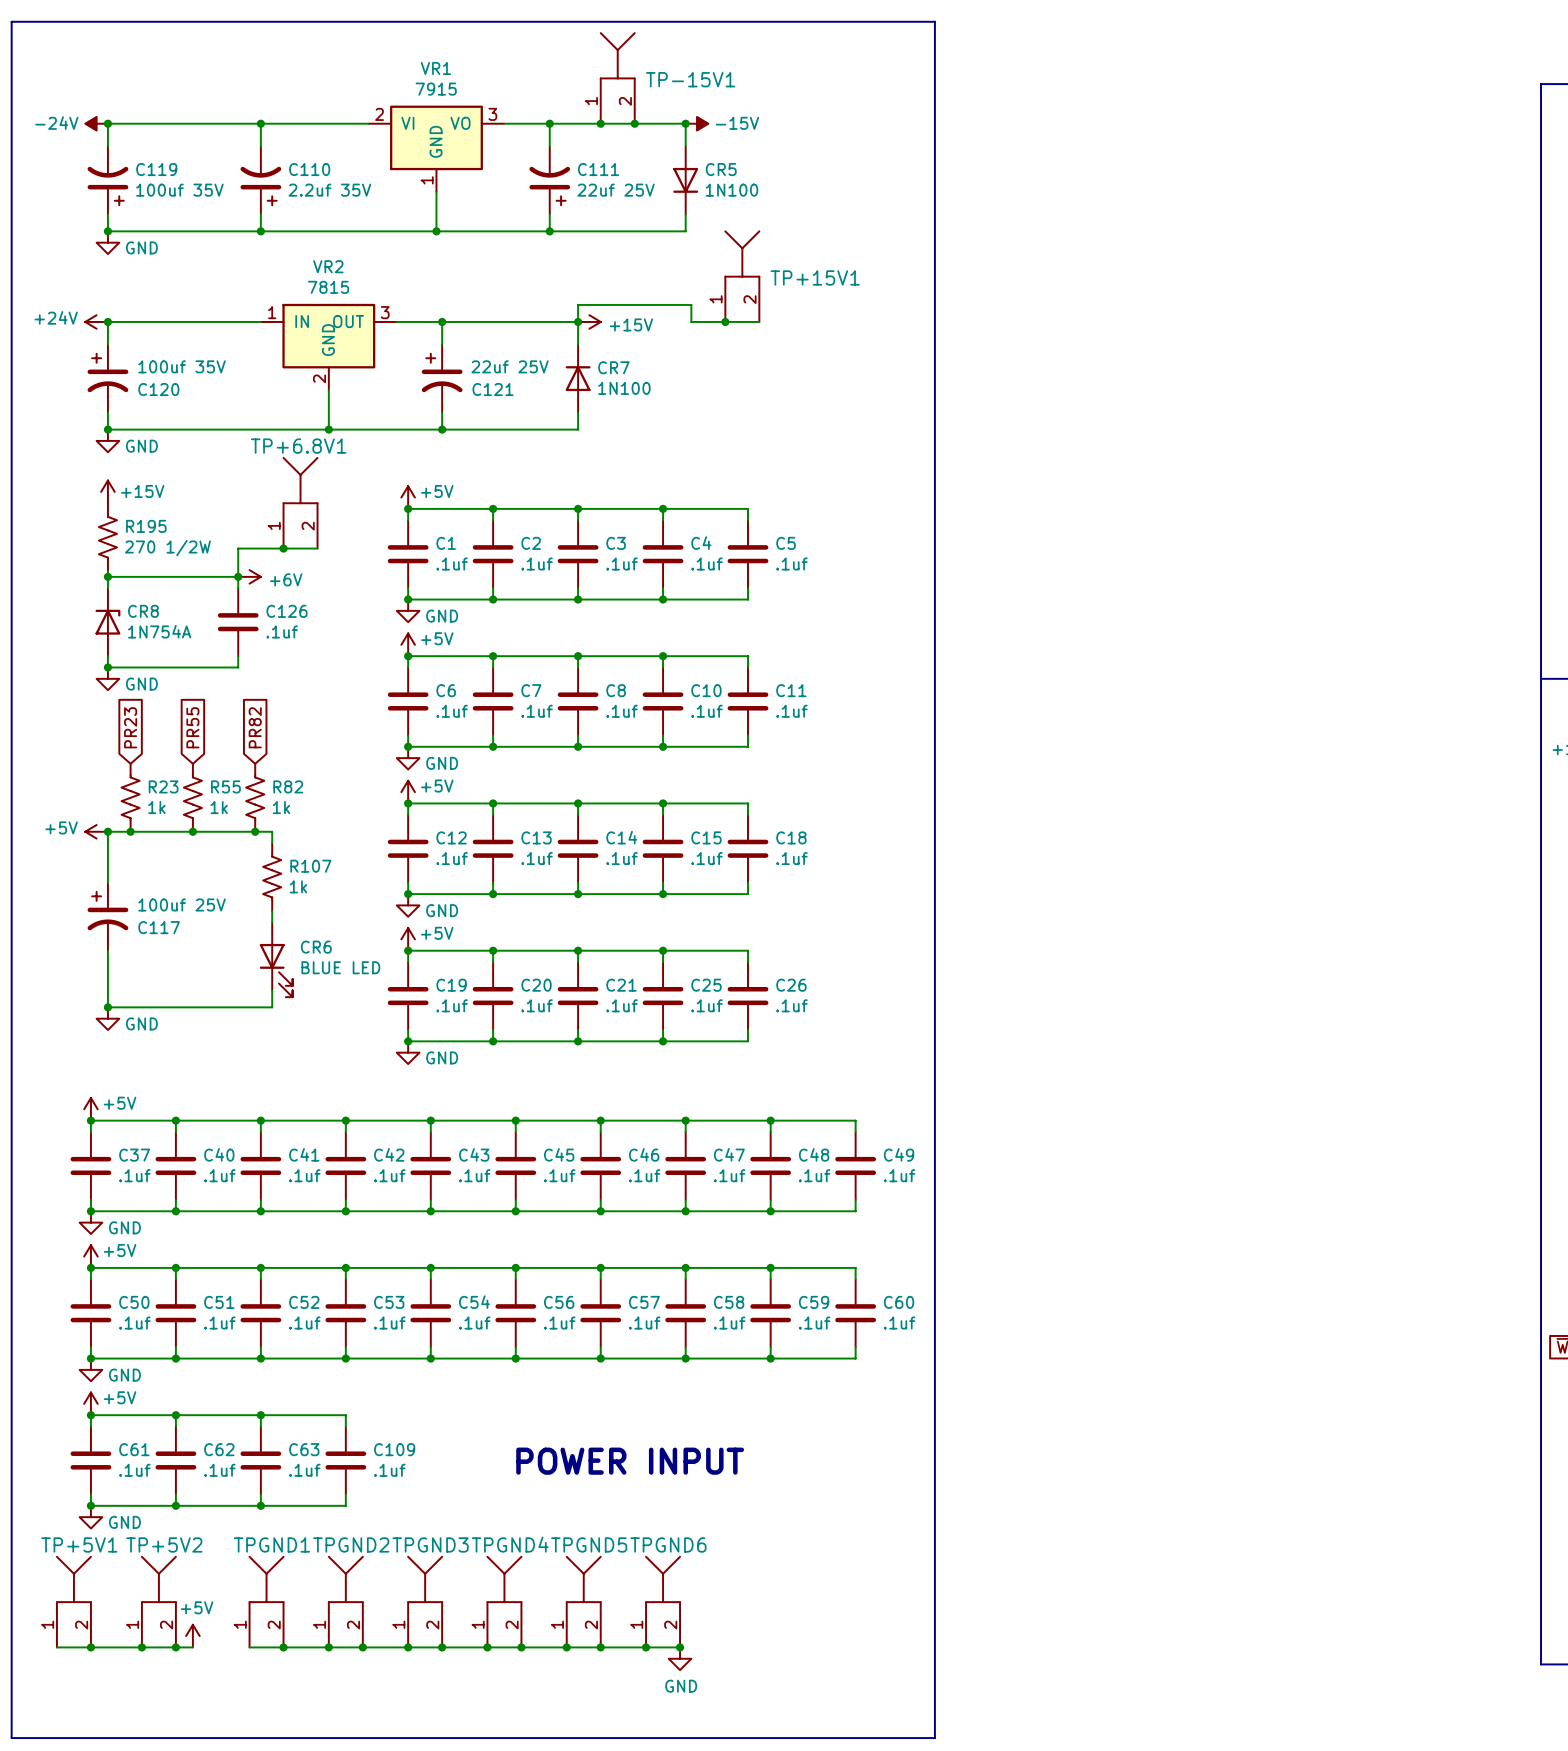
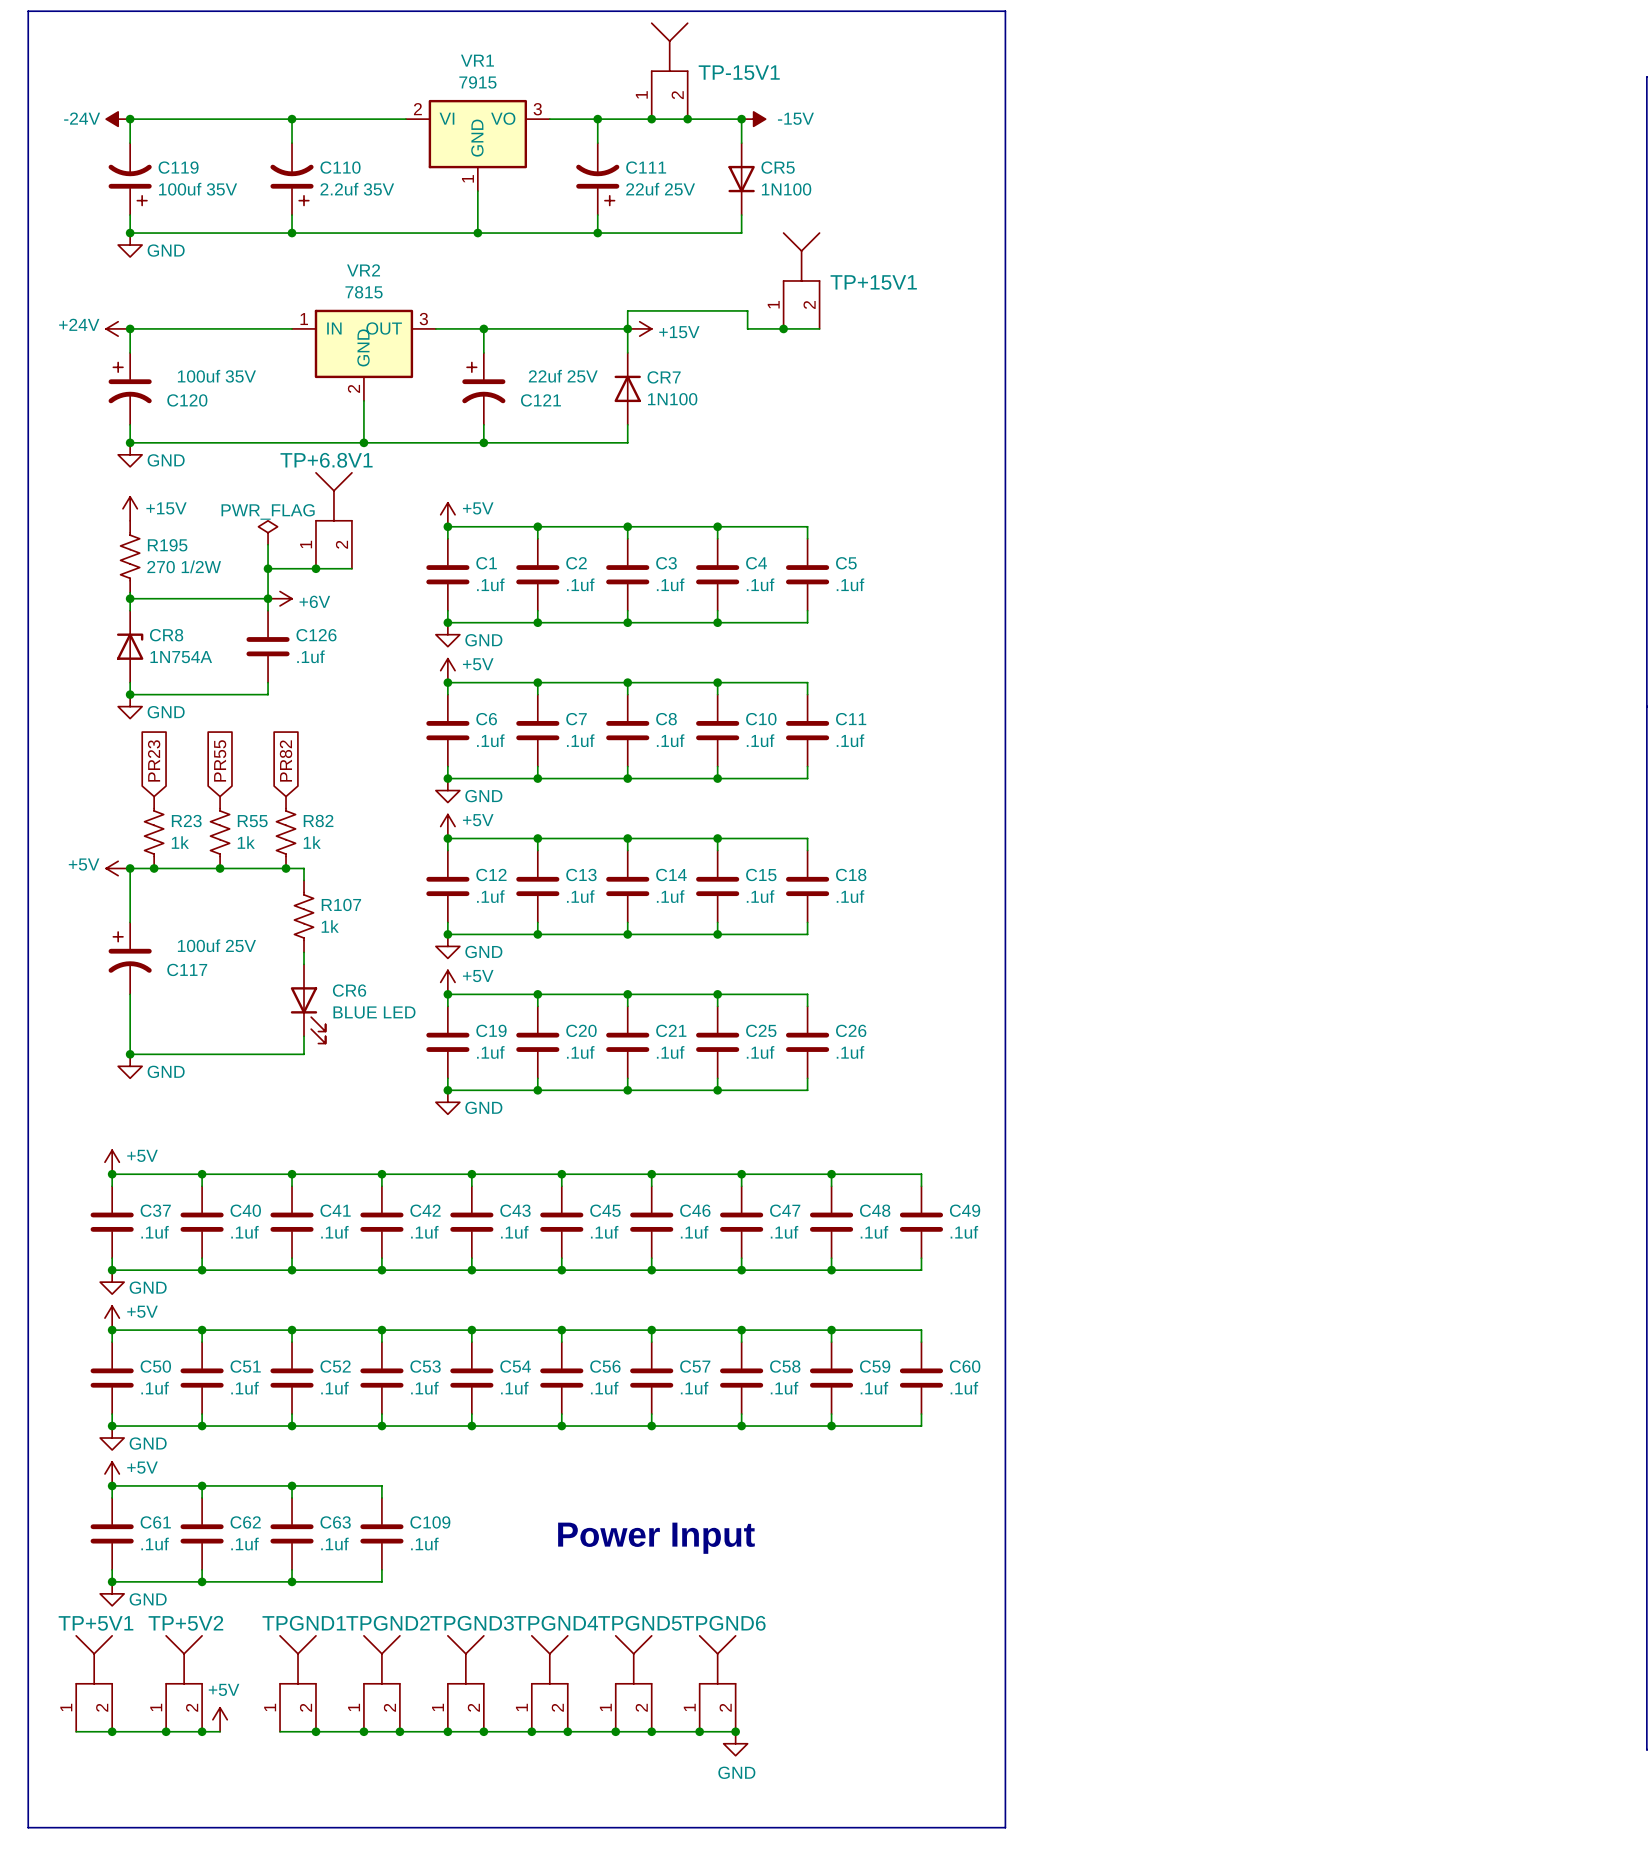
power symbol: none -> PWR_FLAG (268, 532)
wire: none -> (268, 544) (268, 568)
junction: none -> (268, 568)
text: POWER INPUT (630, 1461) -> Power Input (656, 1538)

